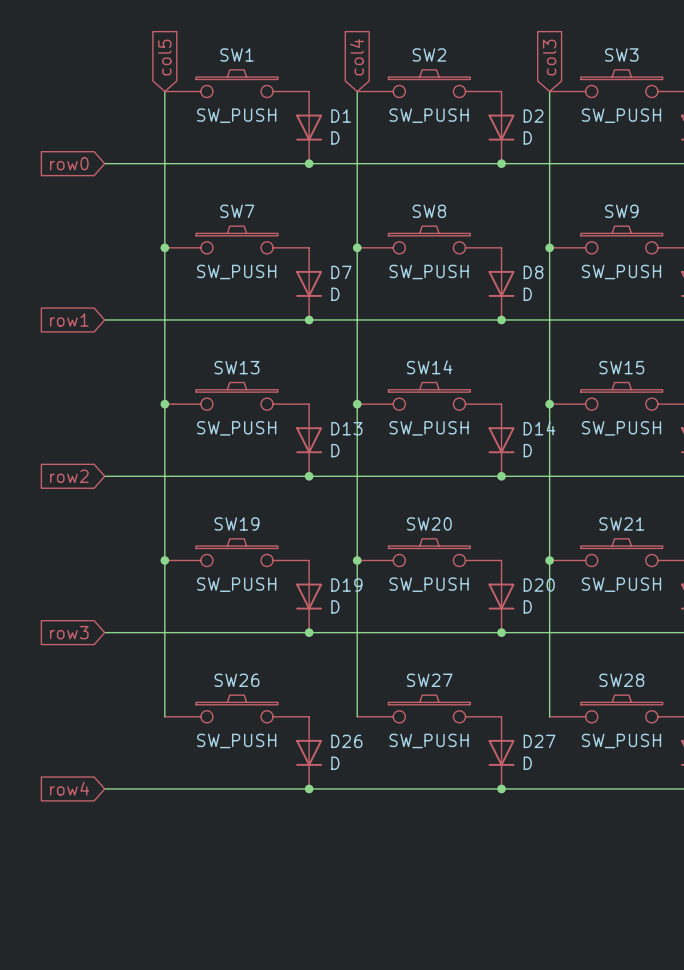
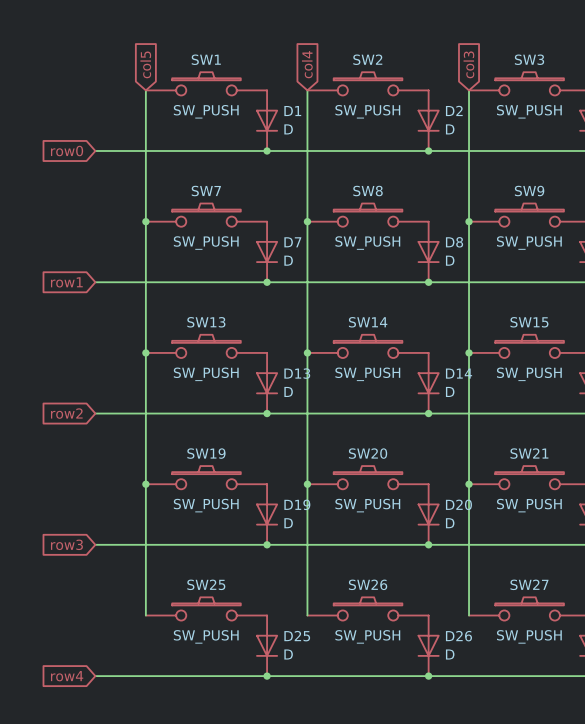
SW26 name: SW26 (236, 680) -> SW25 (206, 584)
SW27 name: SW27 (429, 680) -> SW26 (368, 584)
SW28 name: SW28 (621, 680) -> SW27 (529, 584)
D26 name: D26 (346, 741) -> D25 (297, 636)
D27 name: D27 (539, 741) -> D26 (458, 636)

